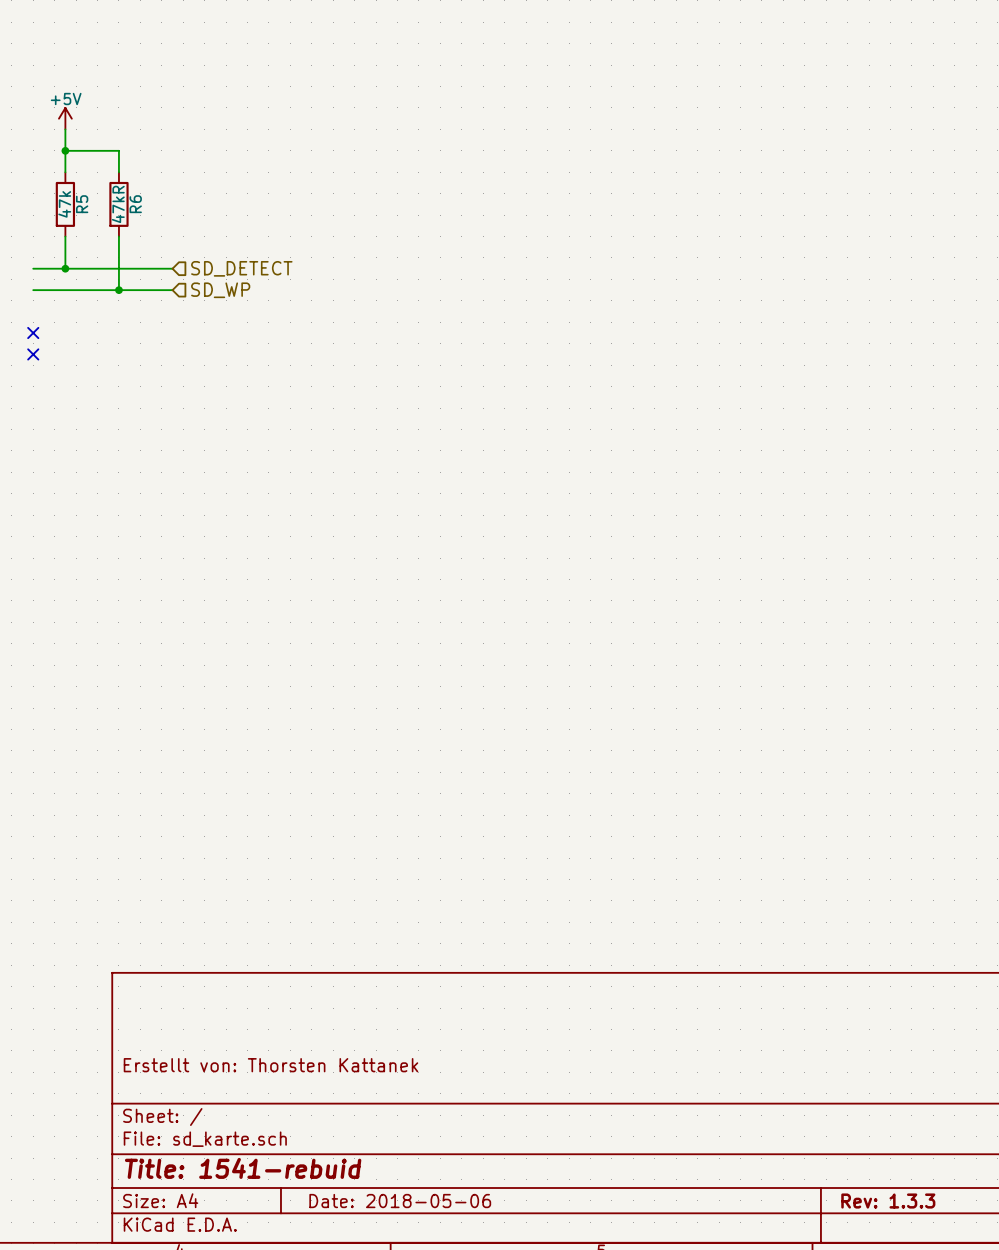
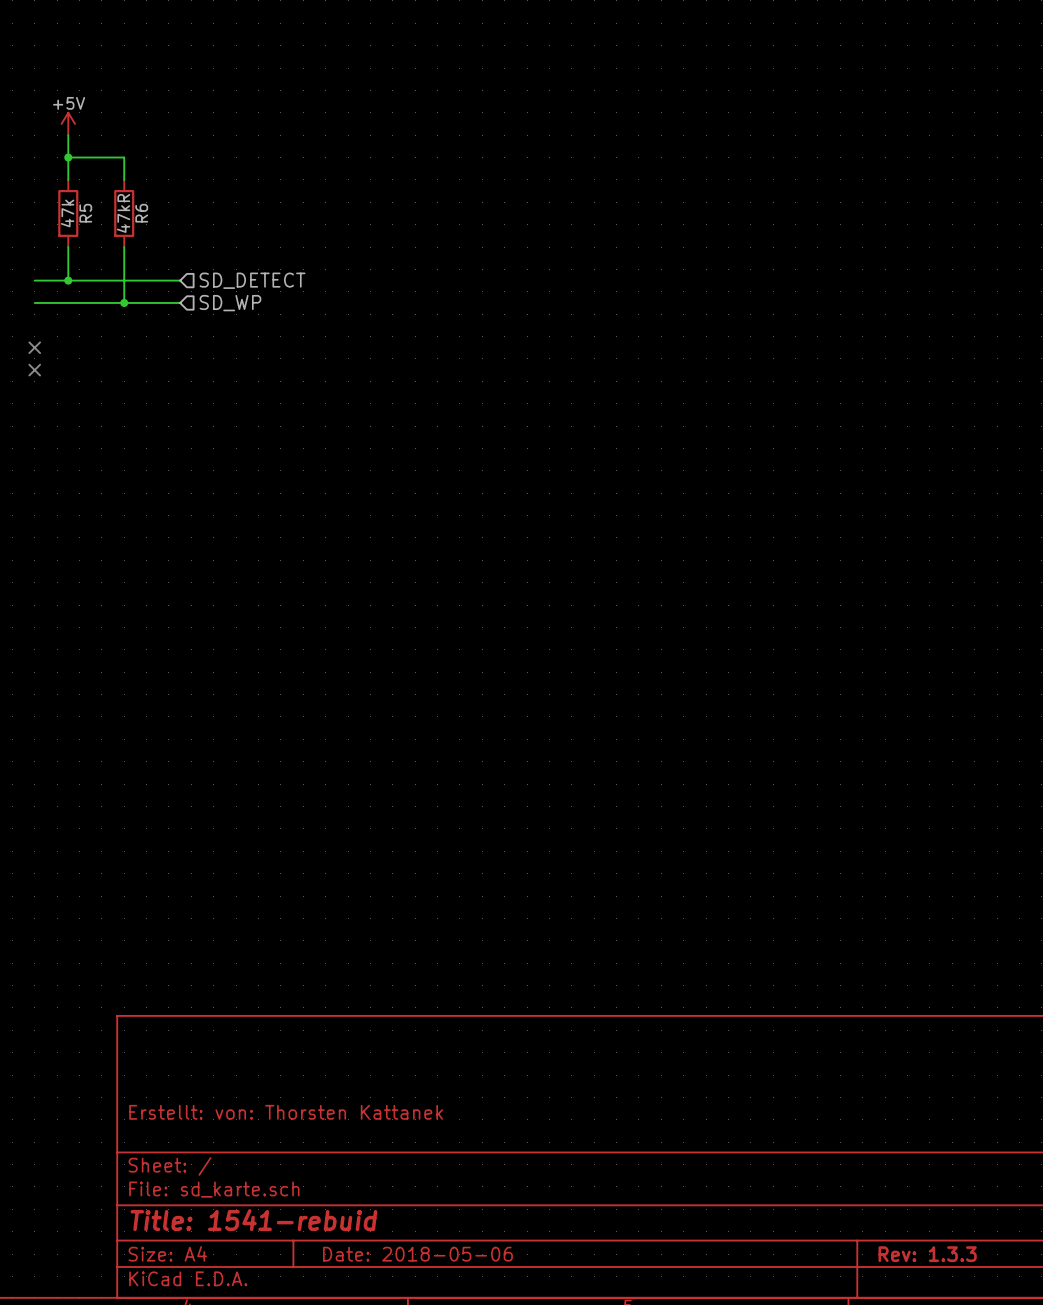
title block: Erstellt von: Thorsten Kattanek (270, 1065) -> Erstellt: von: Thorsten Kattanek (286, 1112)

